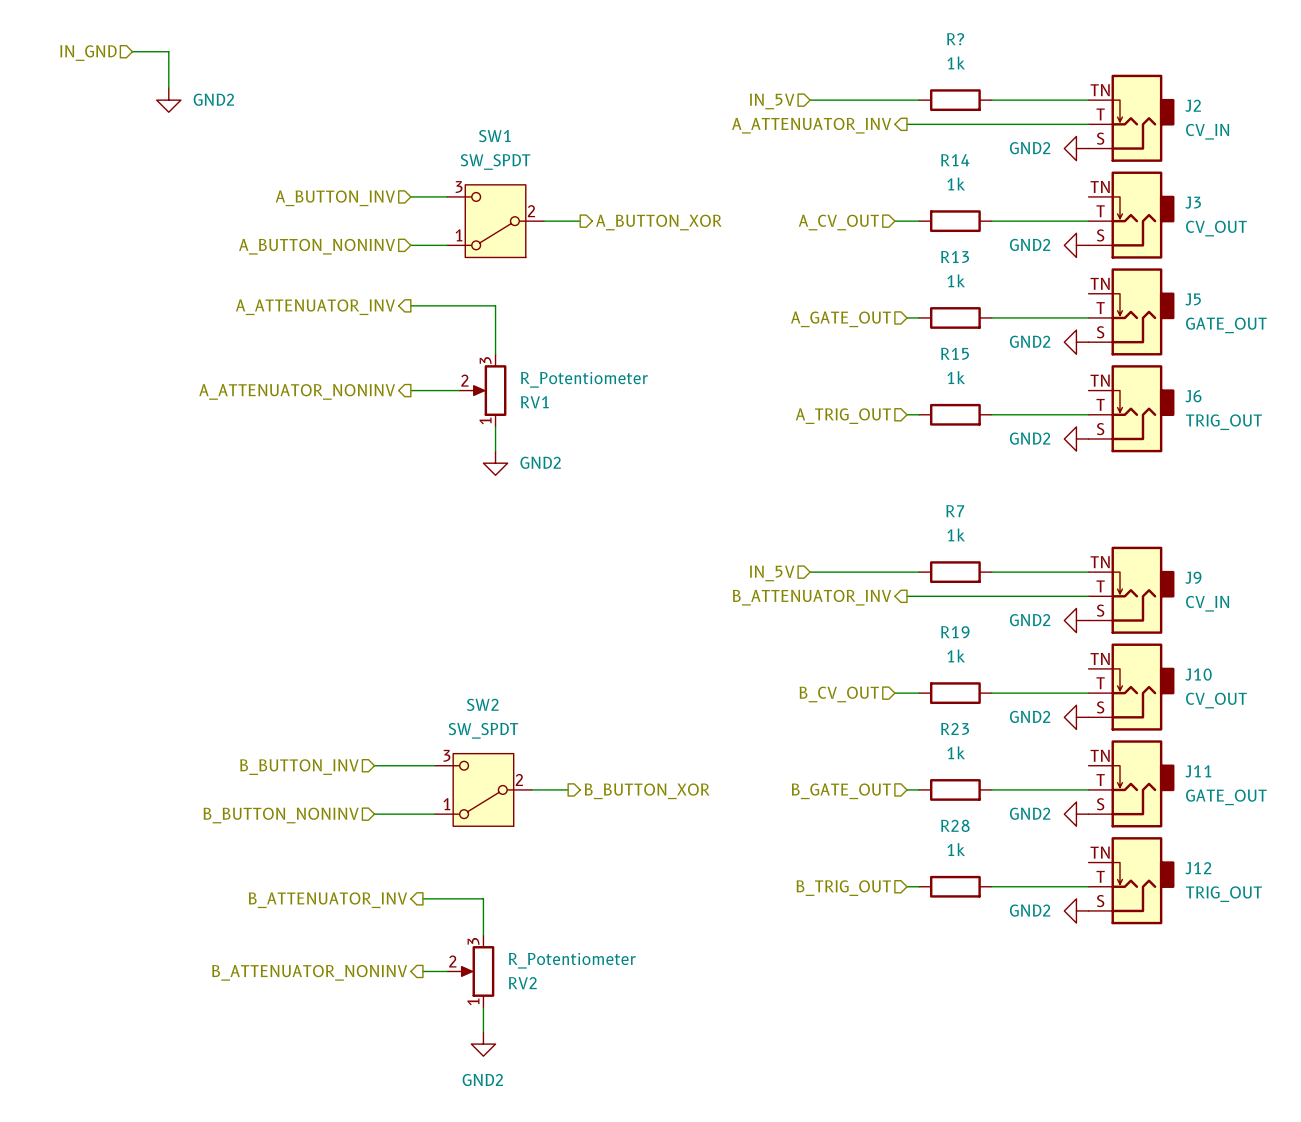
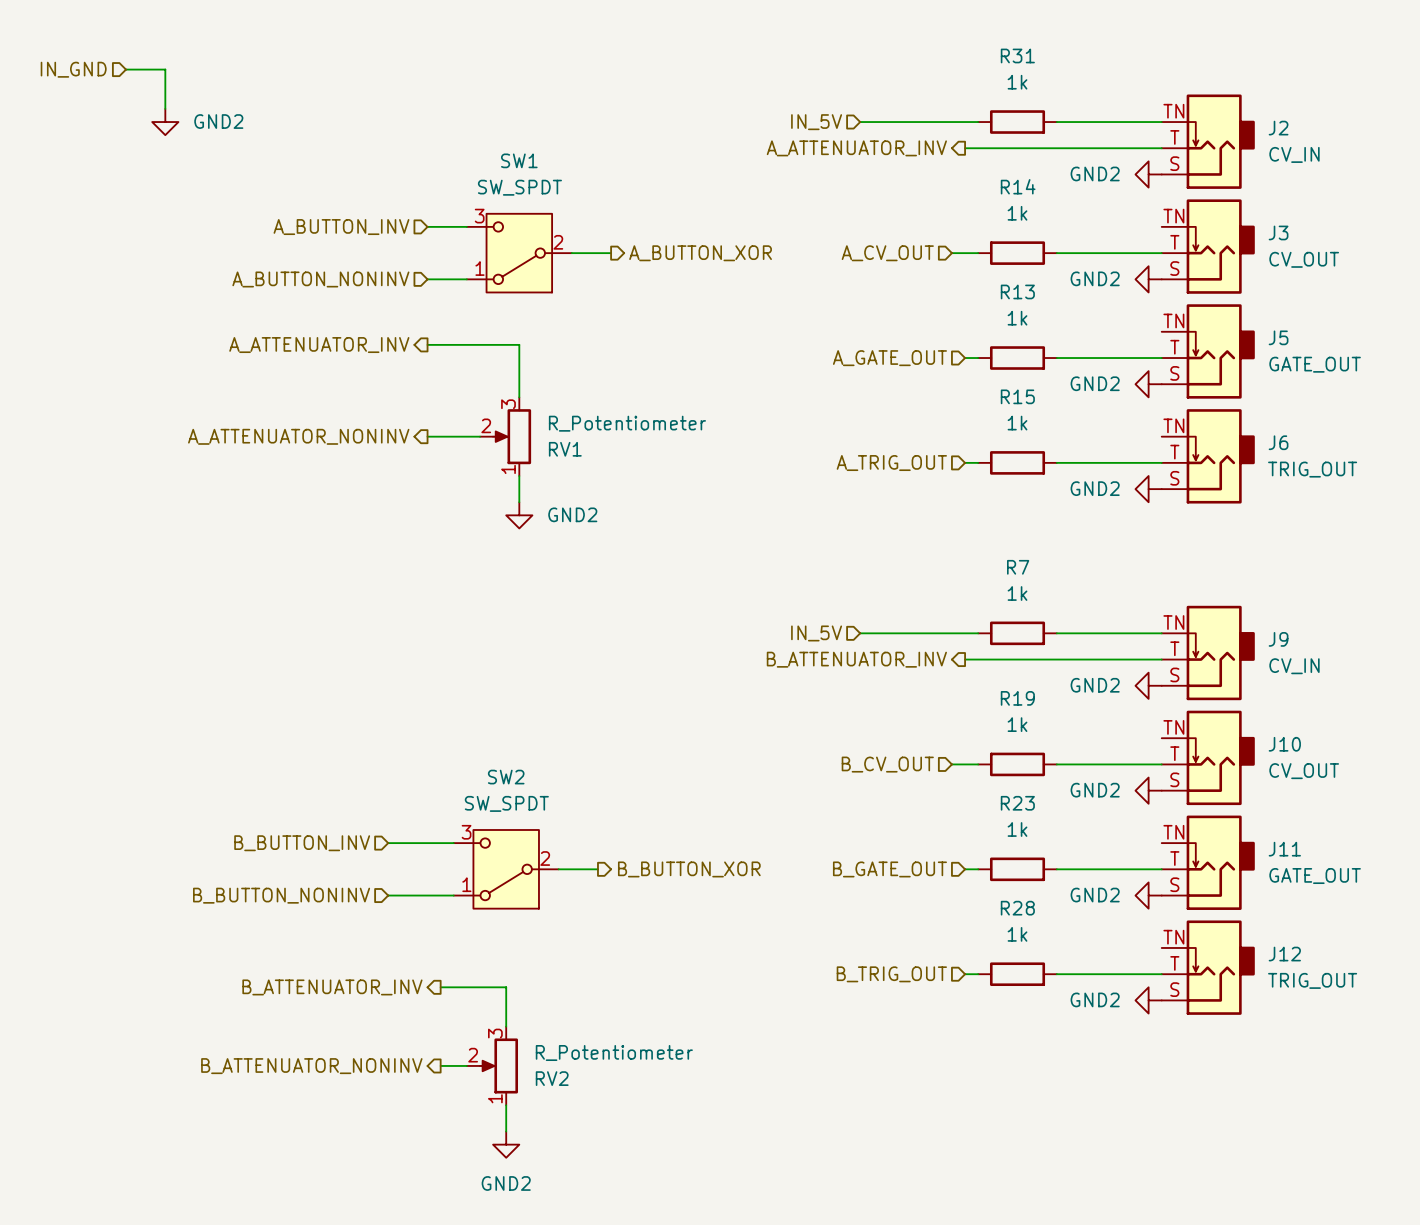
R? name: R? (955, 39) -> R31 (1017, 55)

